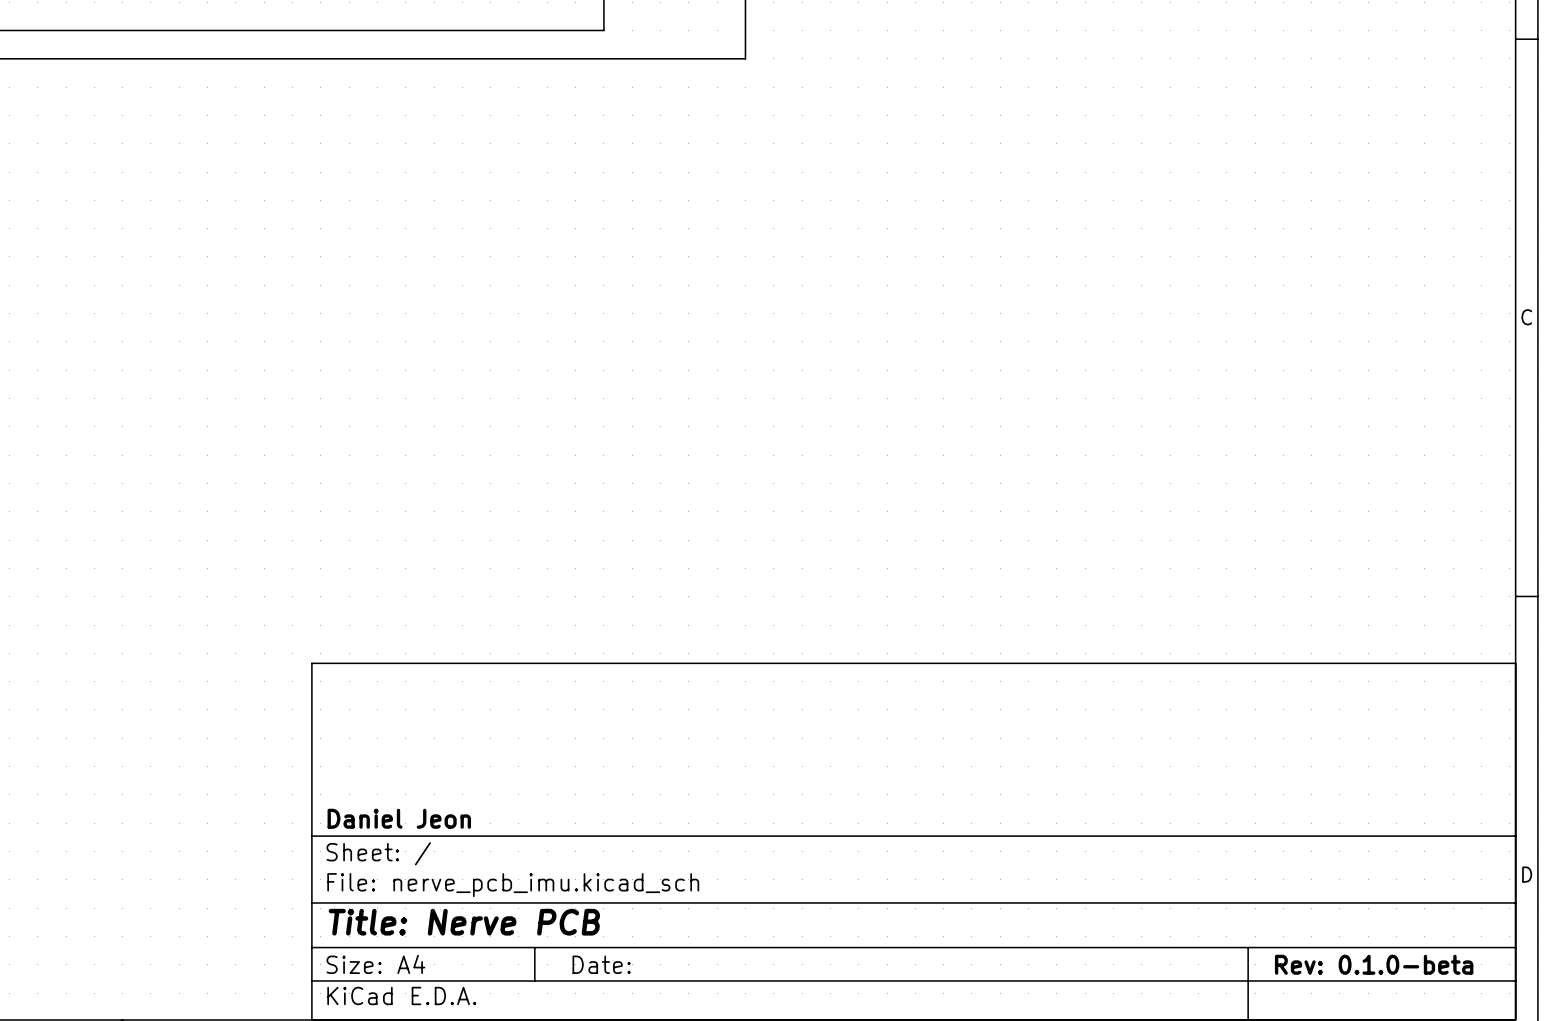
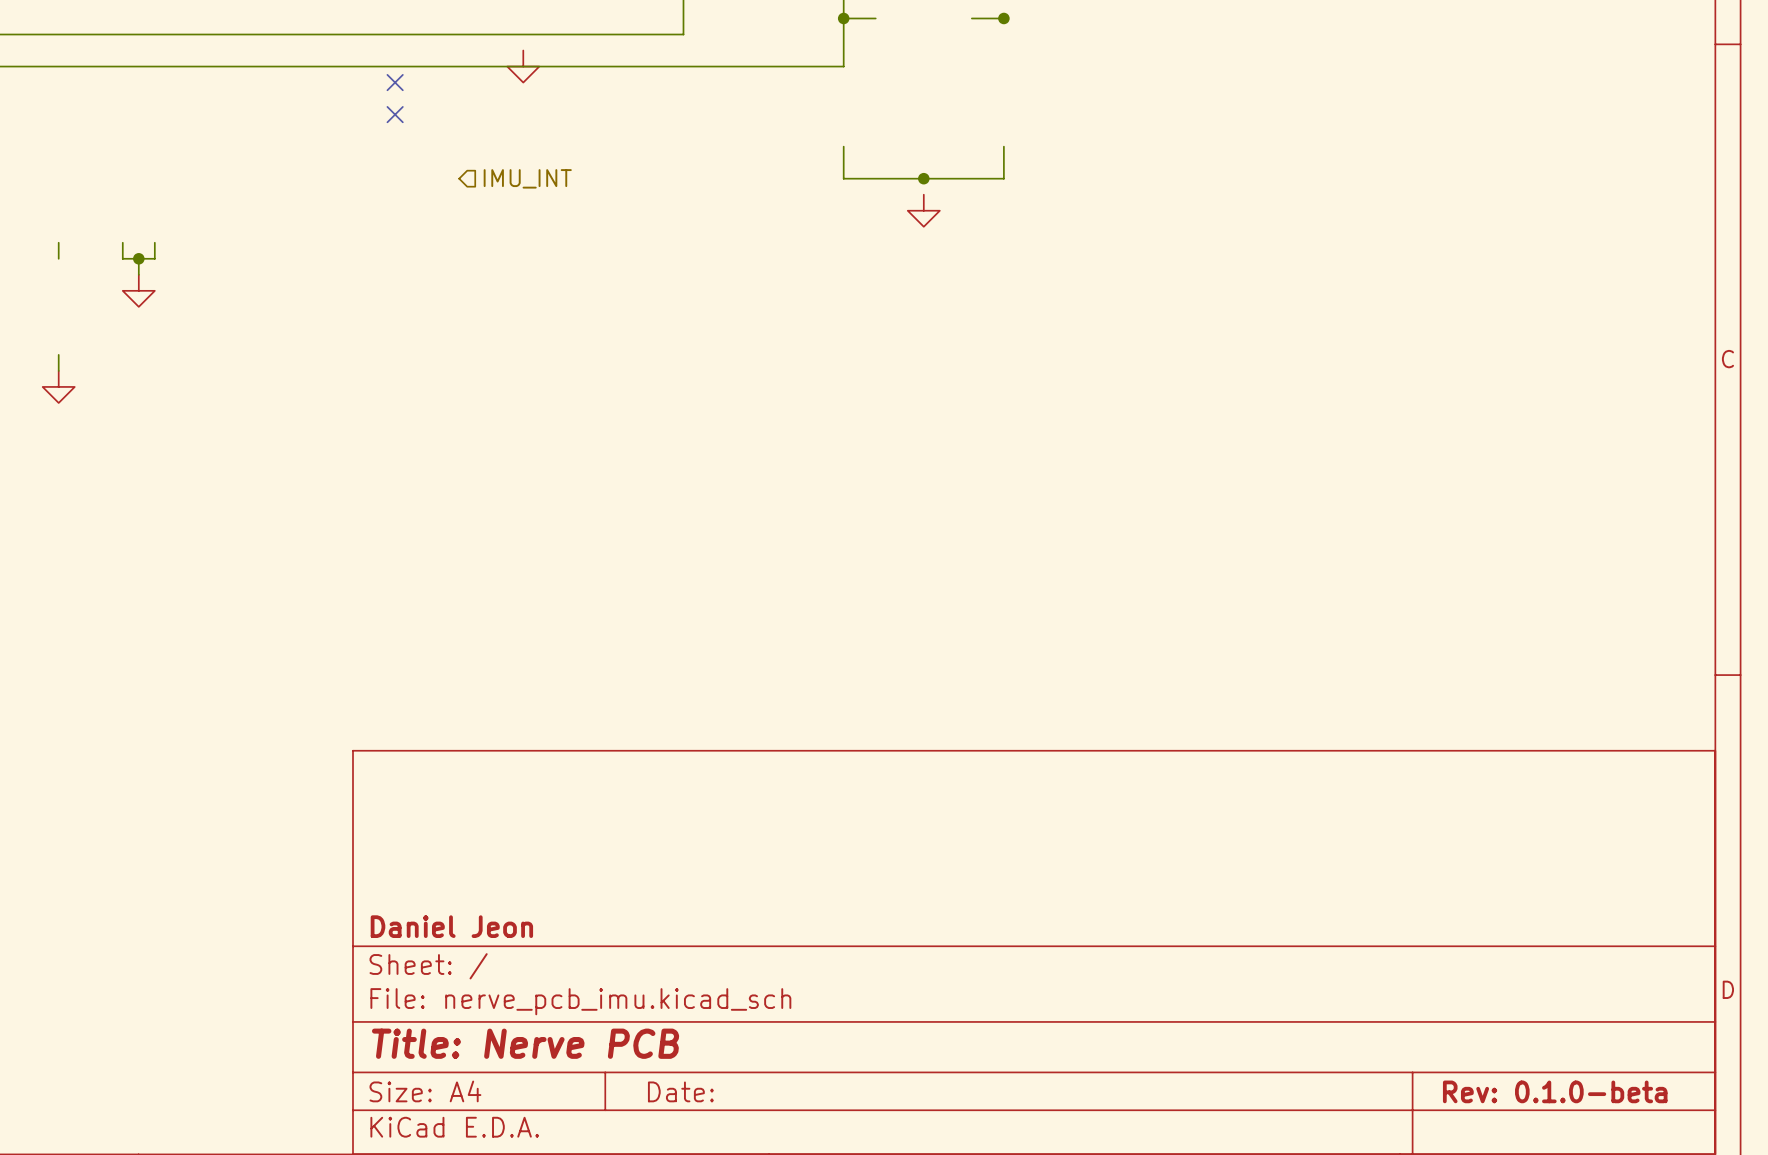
wire: none -> (843, 18) (875, 18)
junction: none -> (843, 18)
wire: none -> (971, 18) (1003, 18)
junction: none -> (1003, 18)
power symbol: none -> (523, 66)
no-connect mark: none -> (395, 82)
no-connect mark: none -> (395, 114)
wire: none -> (843, 146) (843, 178) (1003, 178) (1003, 146)
junction: none -> (923, 178)
hierarchical label: none -> IMU_INT (527, 178)
power symbol: none -> (923, 210)
wire: none -> (58, 242) (58, 258)
wire: none -> (122, 242) (122, 258) (154, 258) (154, 242)
wire: none -> (138, 258) (138, 274)
junction: none -> (138, 258)
power symbol: none -> (138, 290)
wire: none -> (58, 354) (58, 370)
power symbol: none -> (58, 386)

